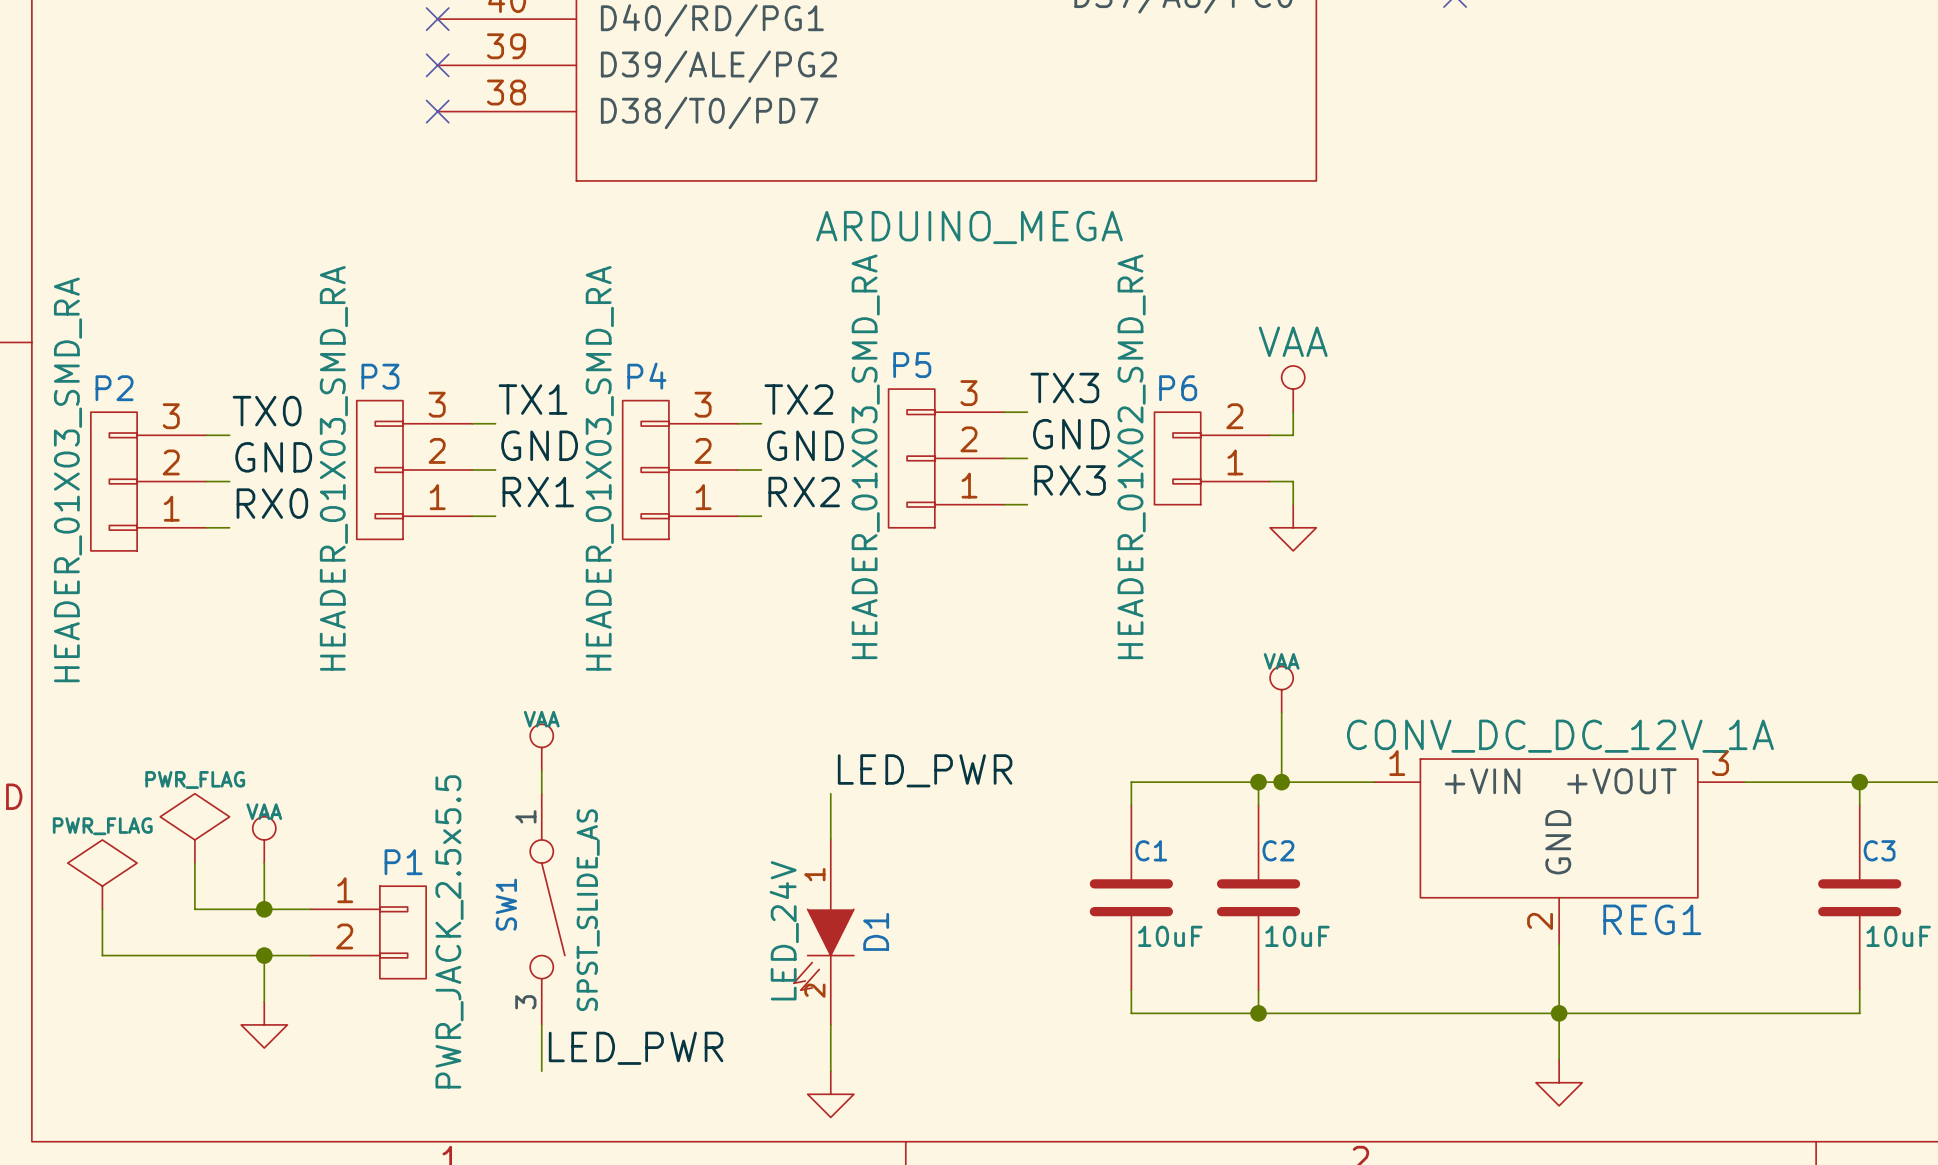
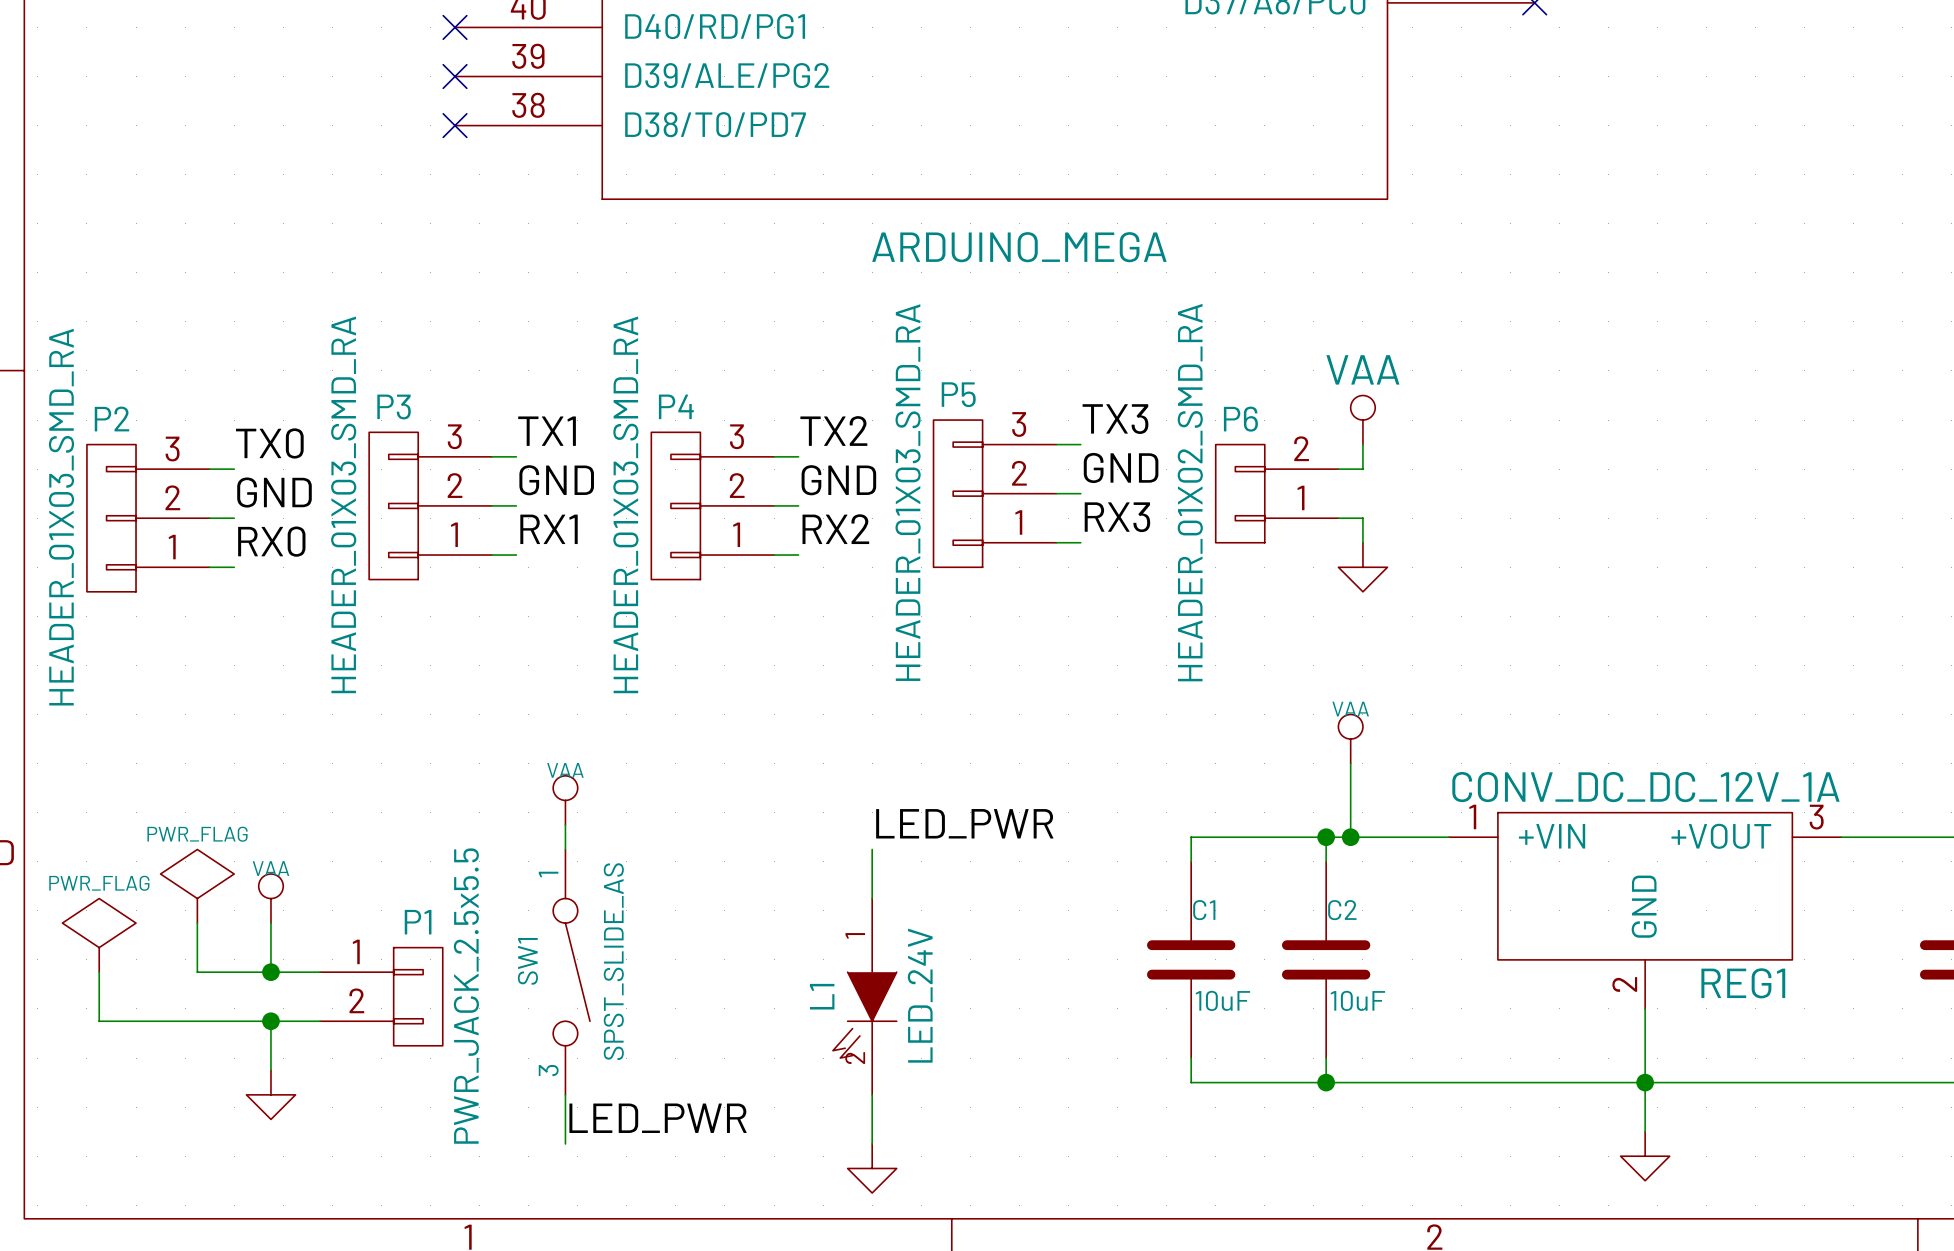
D1 value position: LED_24V (784, 930) -> LED_24V (920, 995)
D1 name: D1 (876, 931) -> L1 (822, 996)

